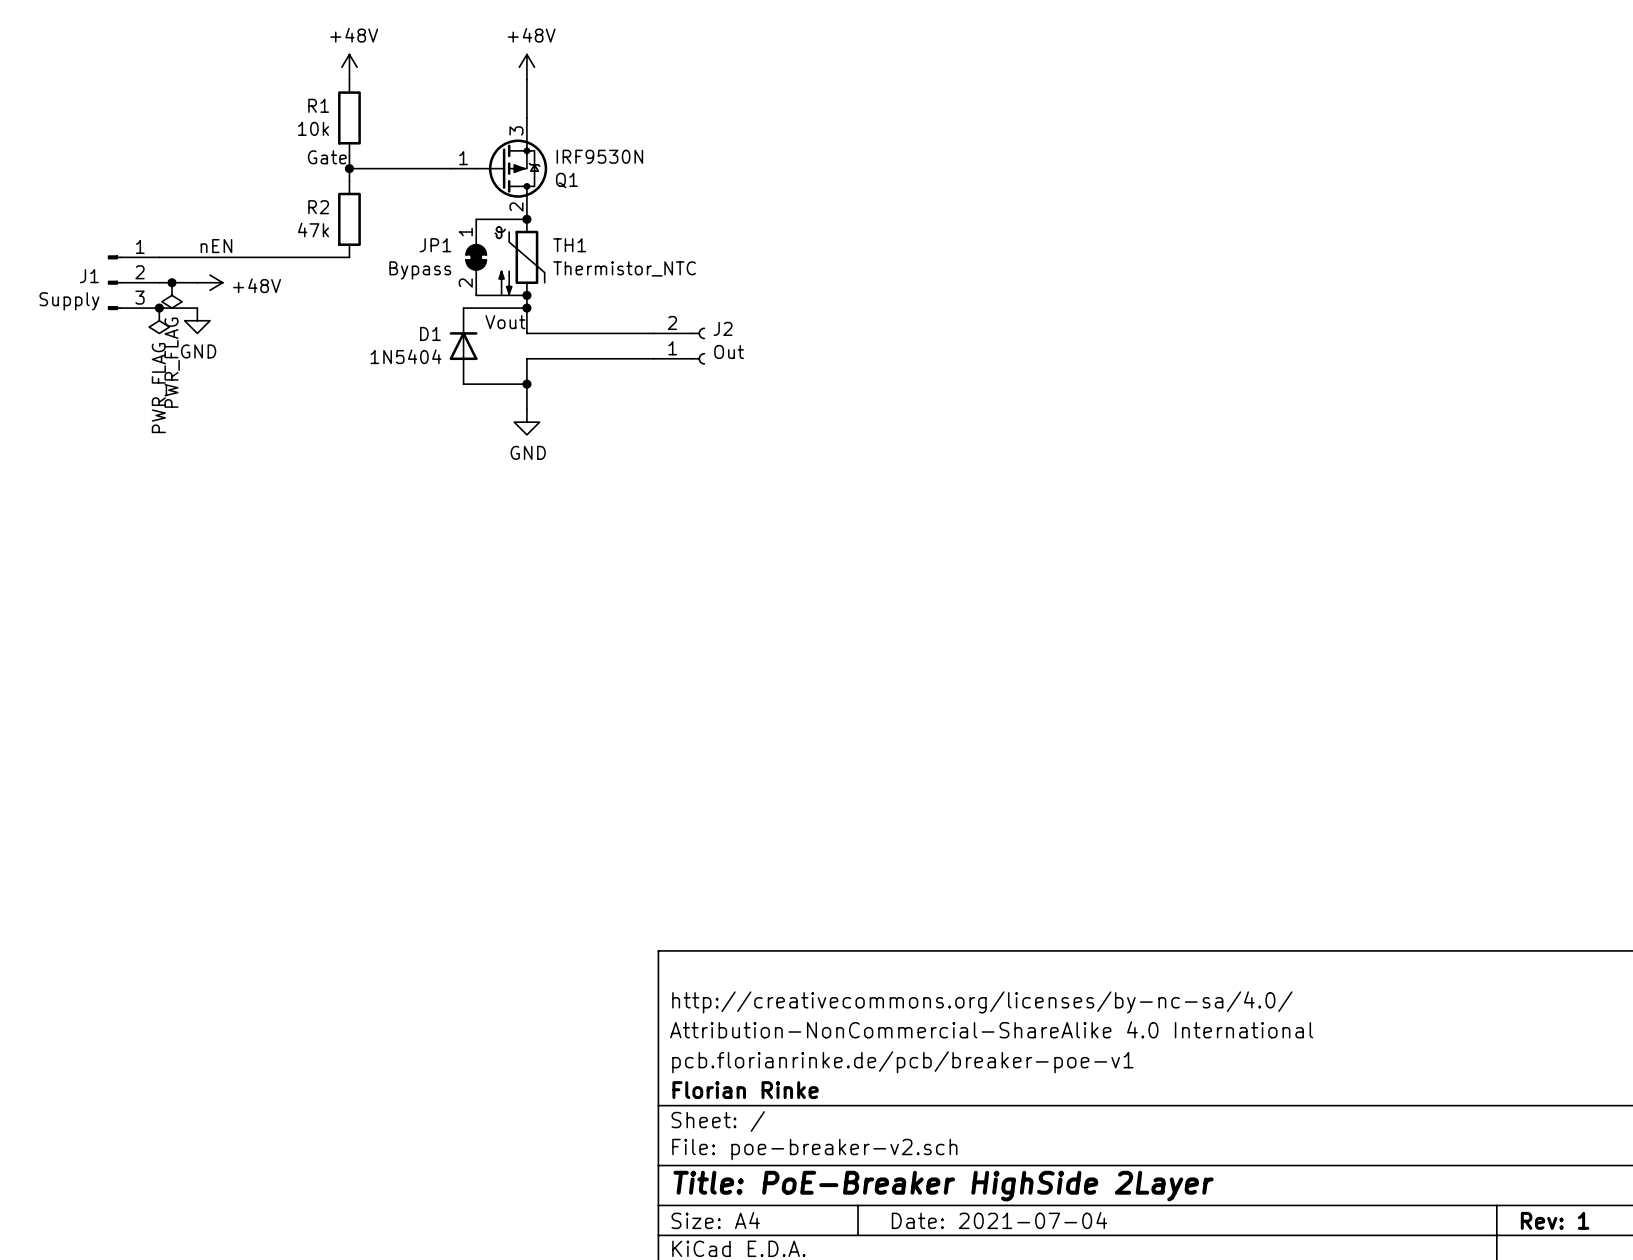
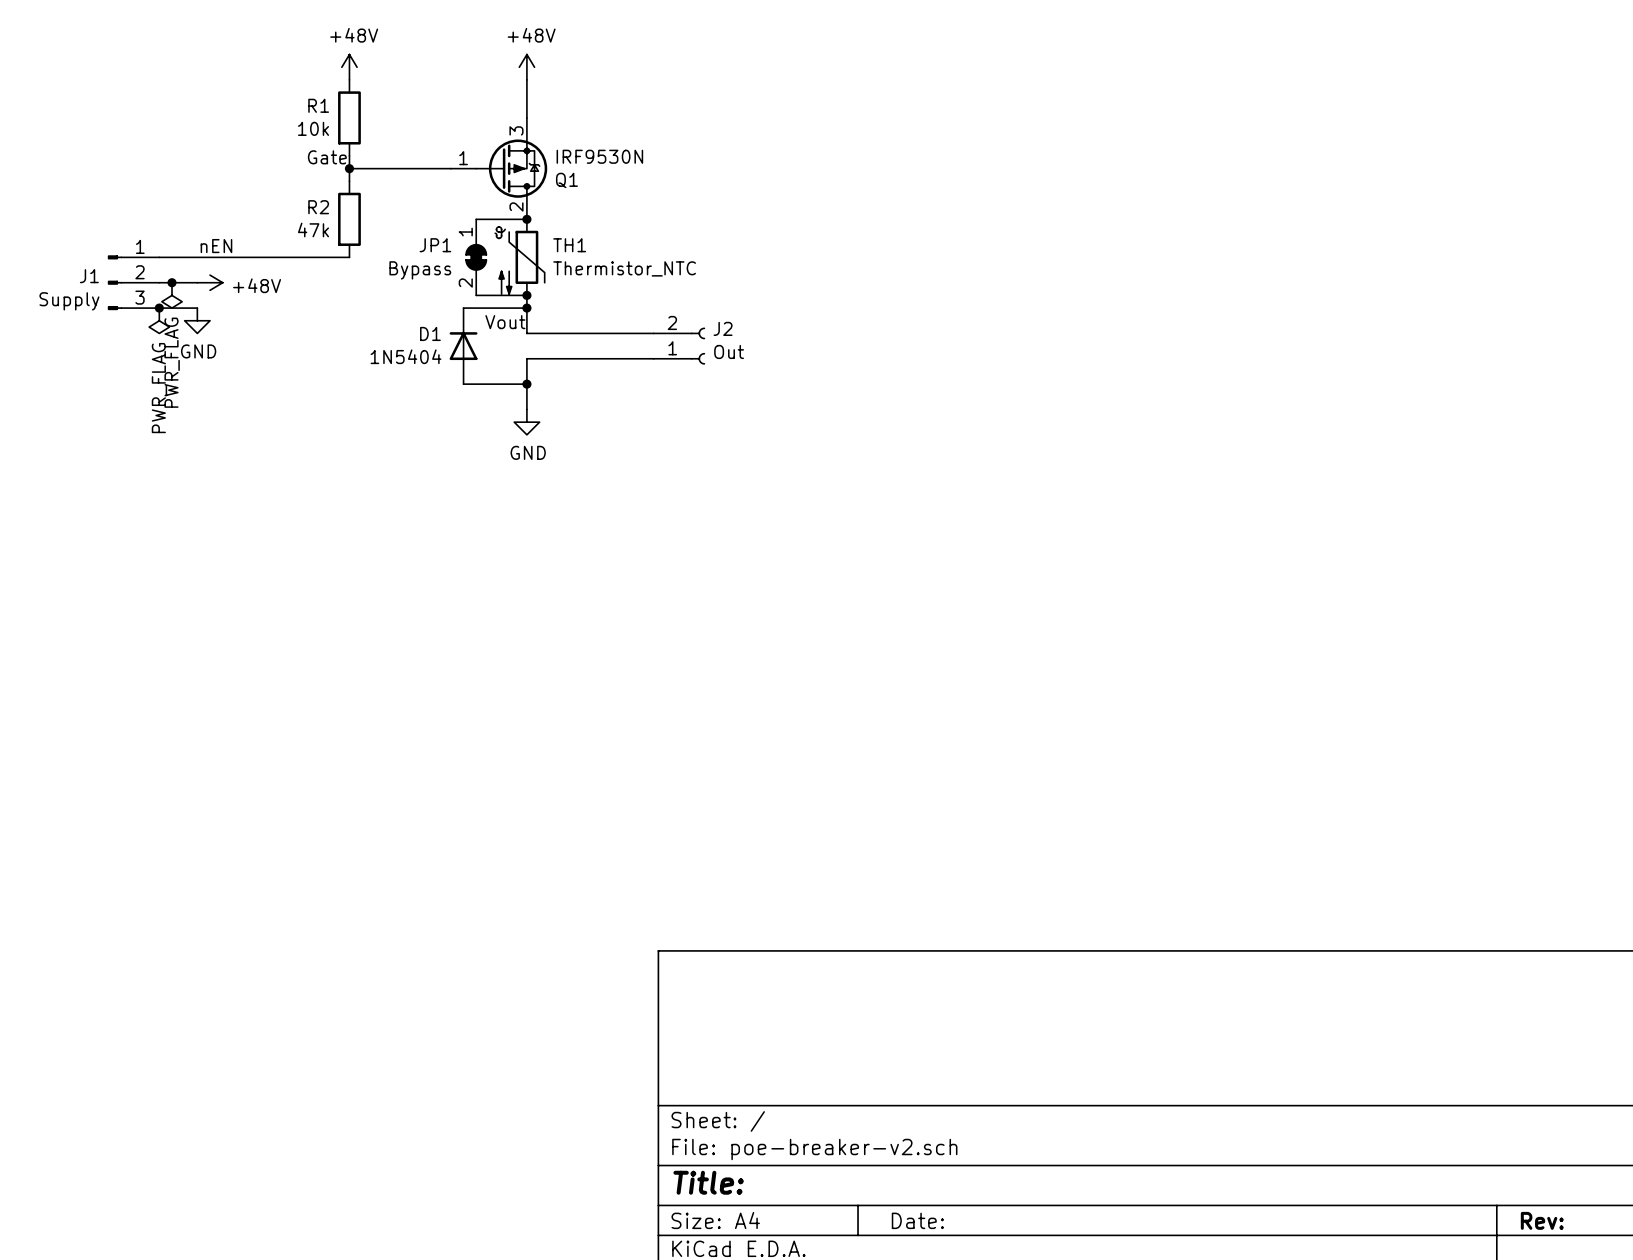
title block: http://creativecommons.org/licenses/by-nc-sa/4.0/ (982, 1002) -> none
title block: Attribution-NonCommercial-ShareAlike 4.0 International (991, 1029) -> none
title block: pcb.florianrinke.de/pcb/breaker-poe-v1 (902, 1062) -> none
title block: Florian Rinke (745, 1090) -> none
title block: Title: PoE-Breaker HighSide 2Layer (943, 1186) -> Title: (708, 1182)
title block: Date: 2021-07-04 (999, 1220) -> Date: (917, 1220)
title block: Rev: 1 (1555, 1220) -> Rev: (1542, 1220)

